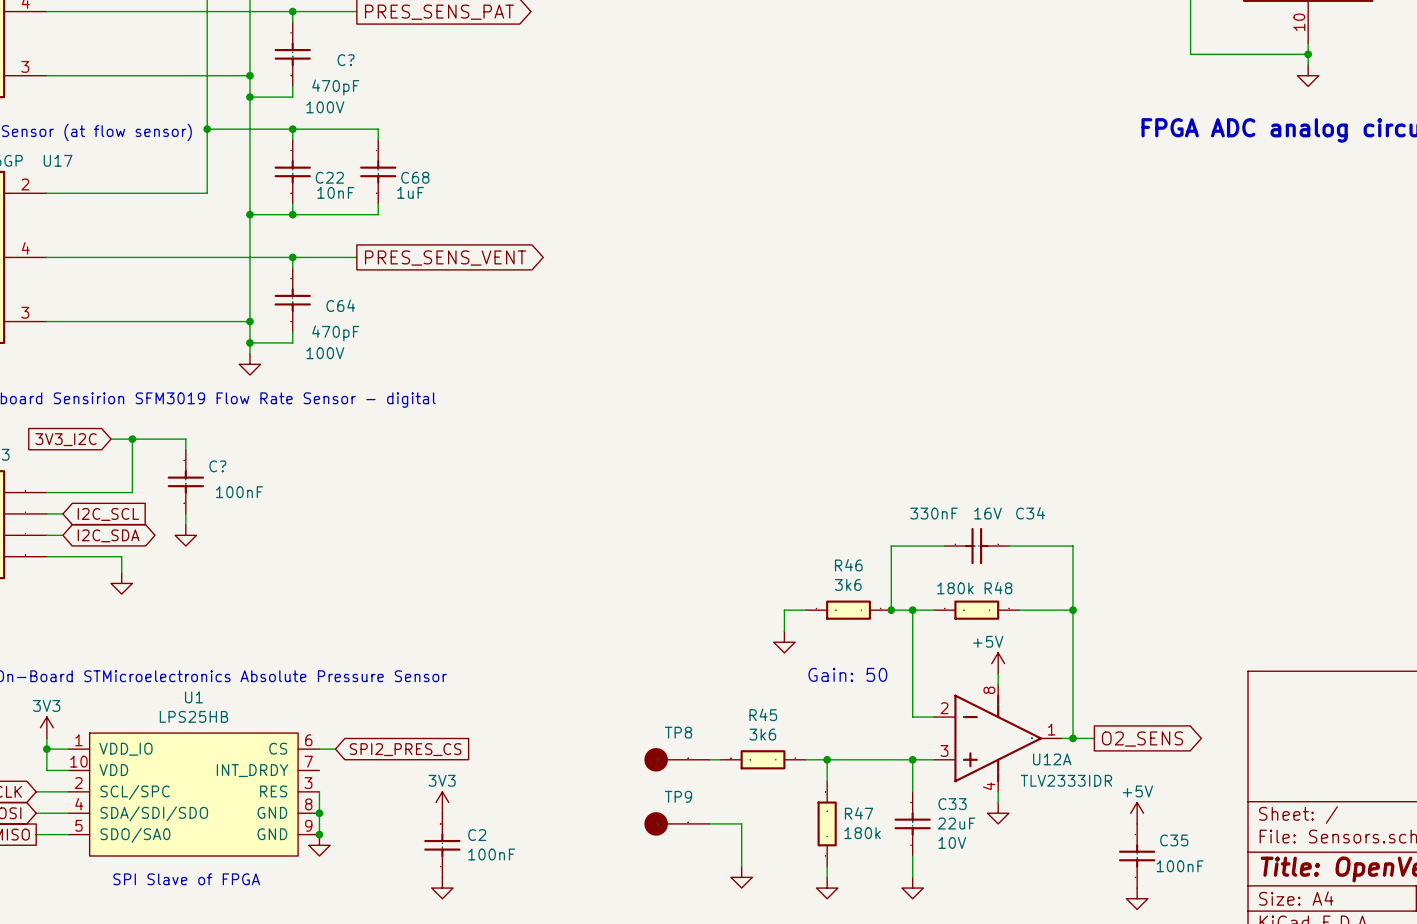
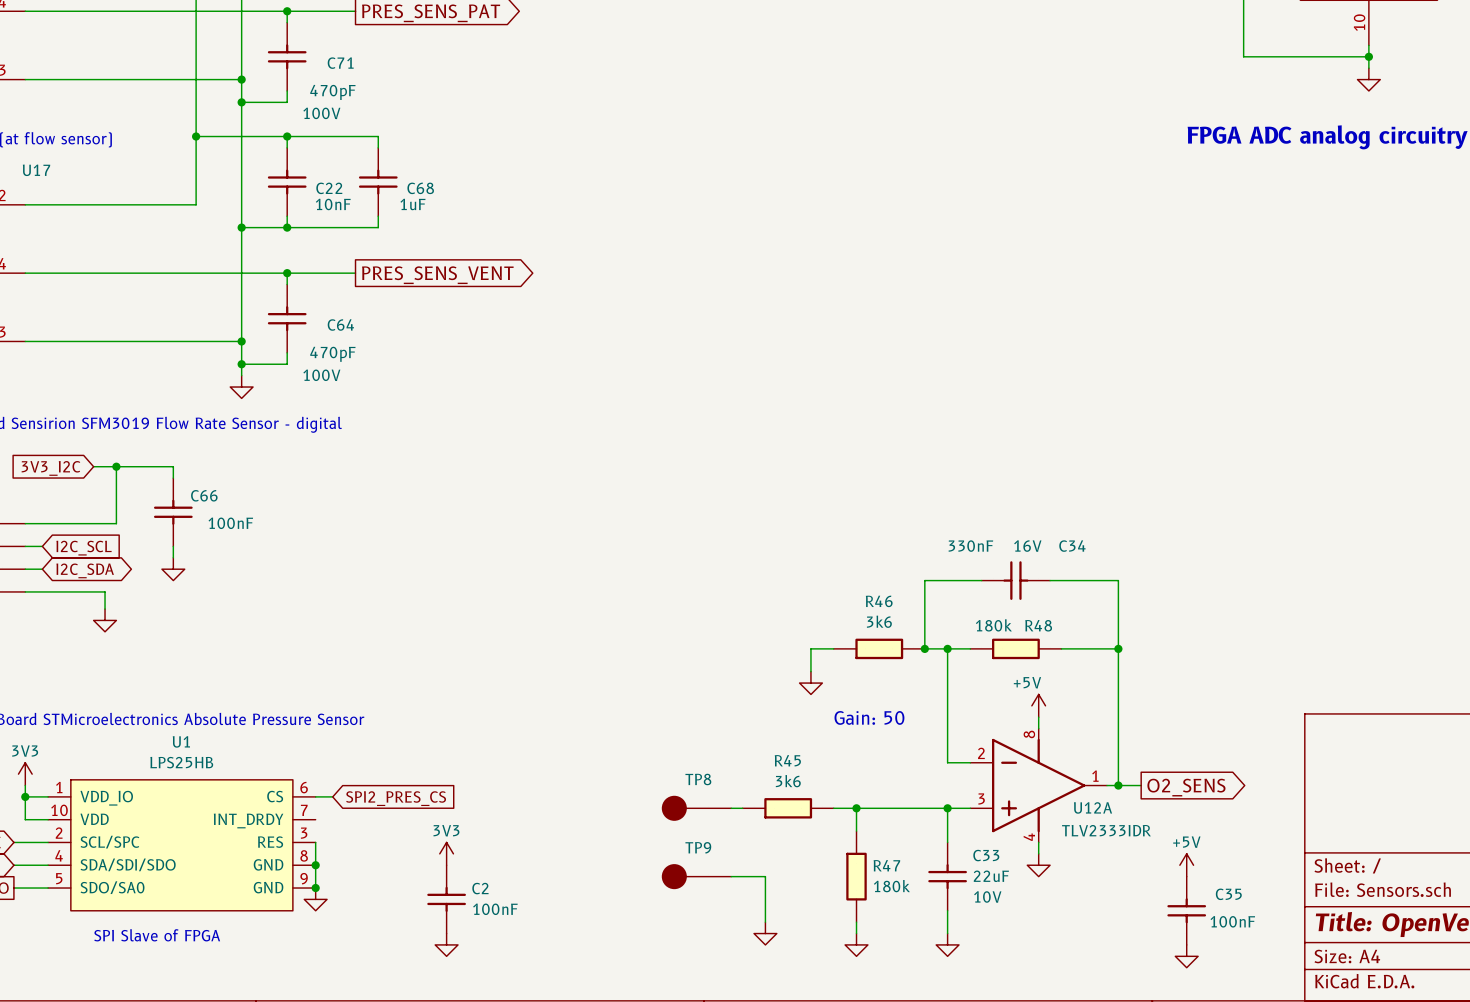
C? name: C? (346, 60) -> C71 (340, 63)
C? name: C? (217, 466) -> C66 (204, 495)

